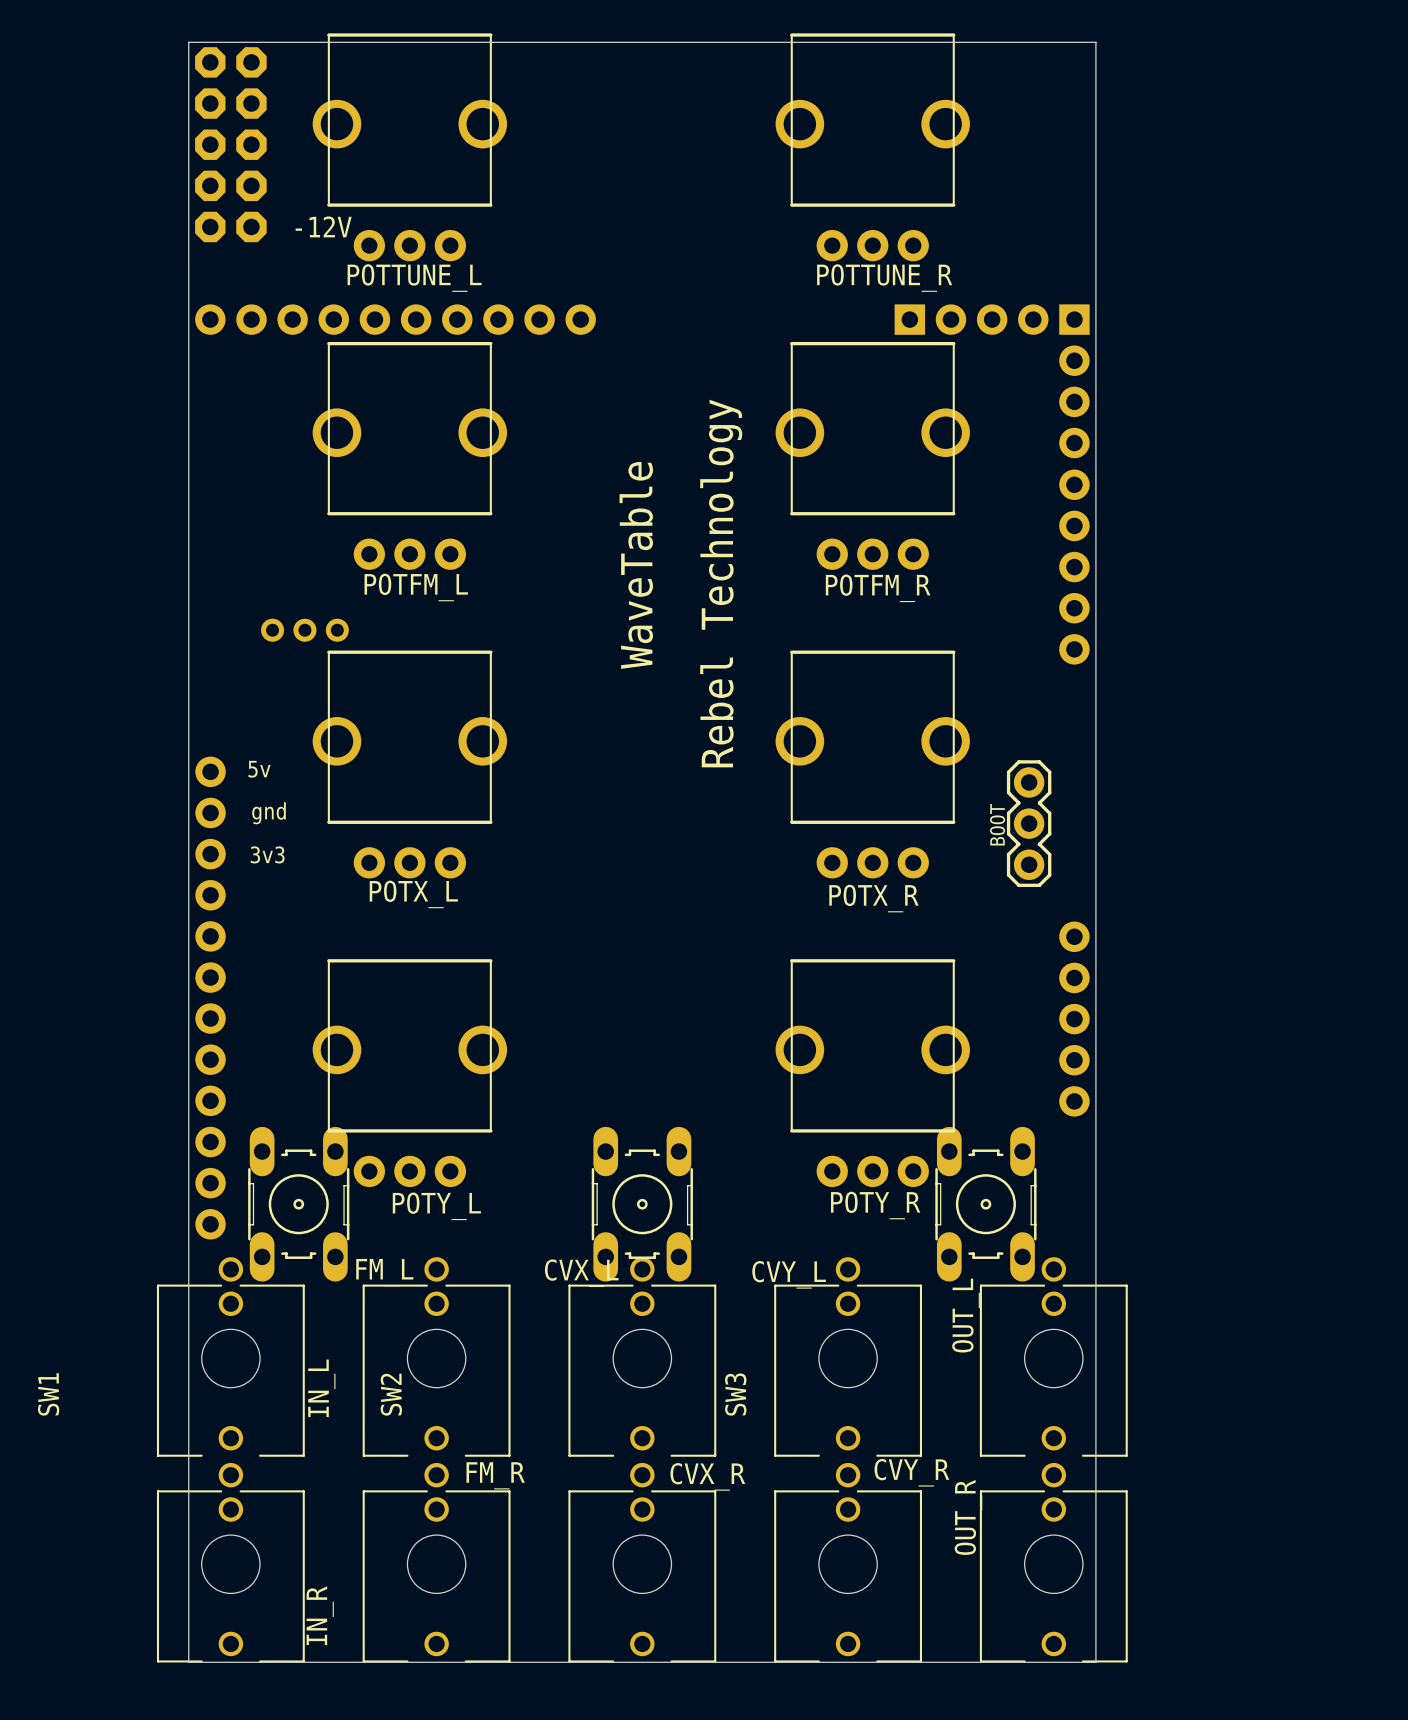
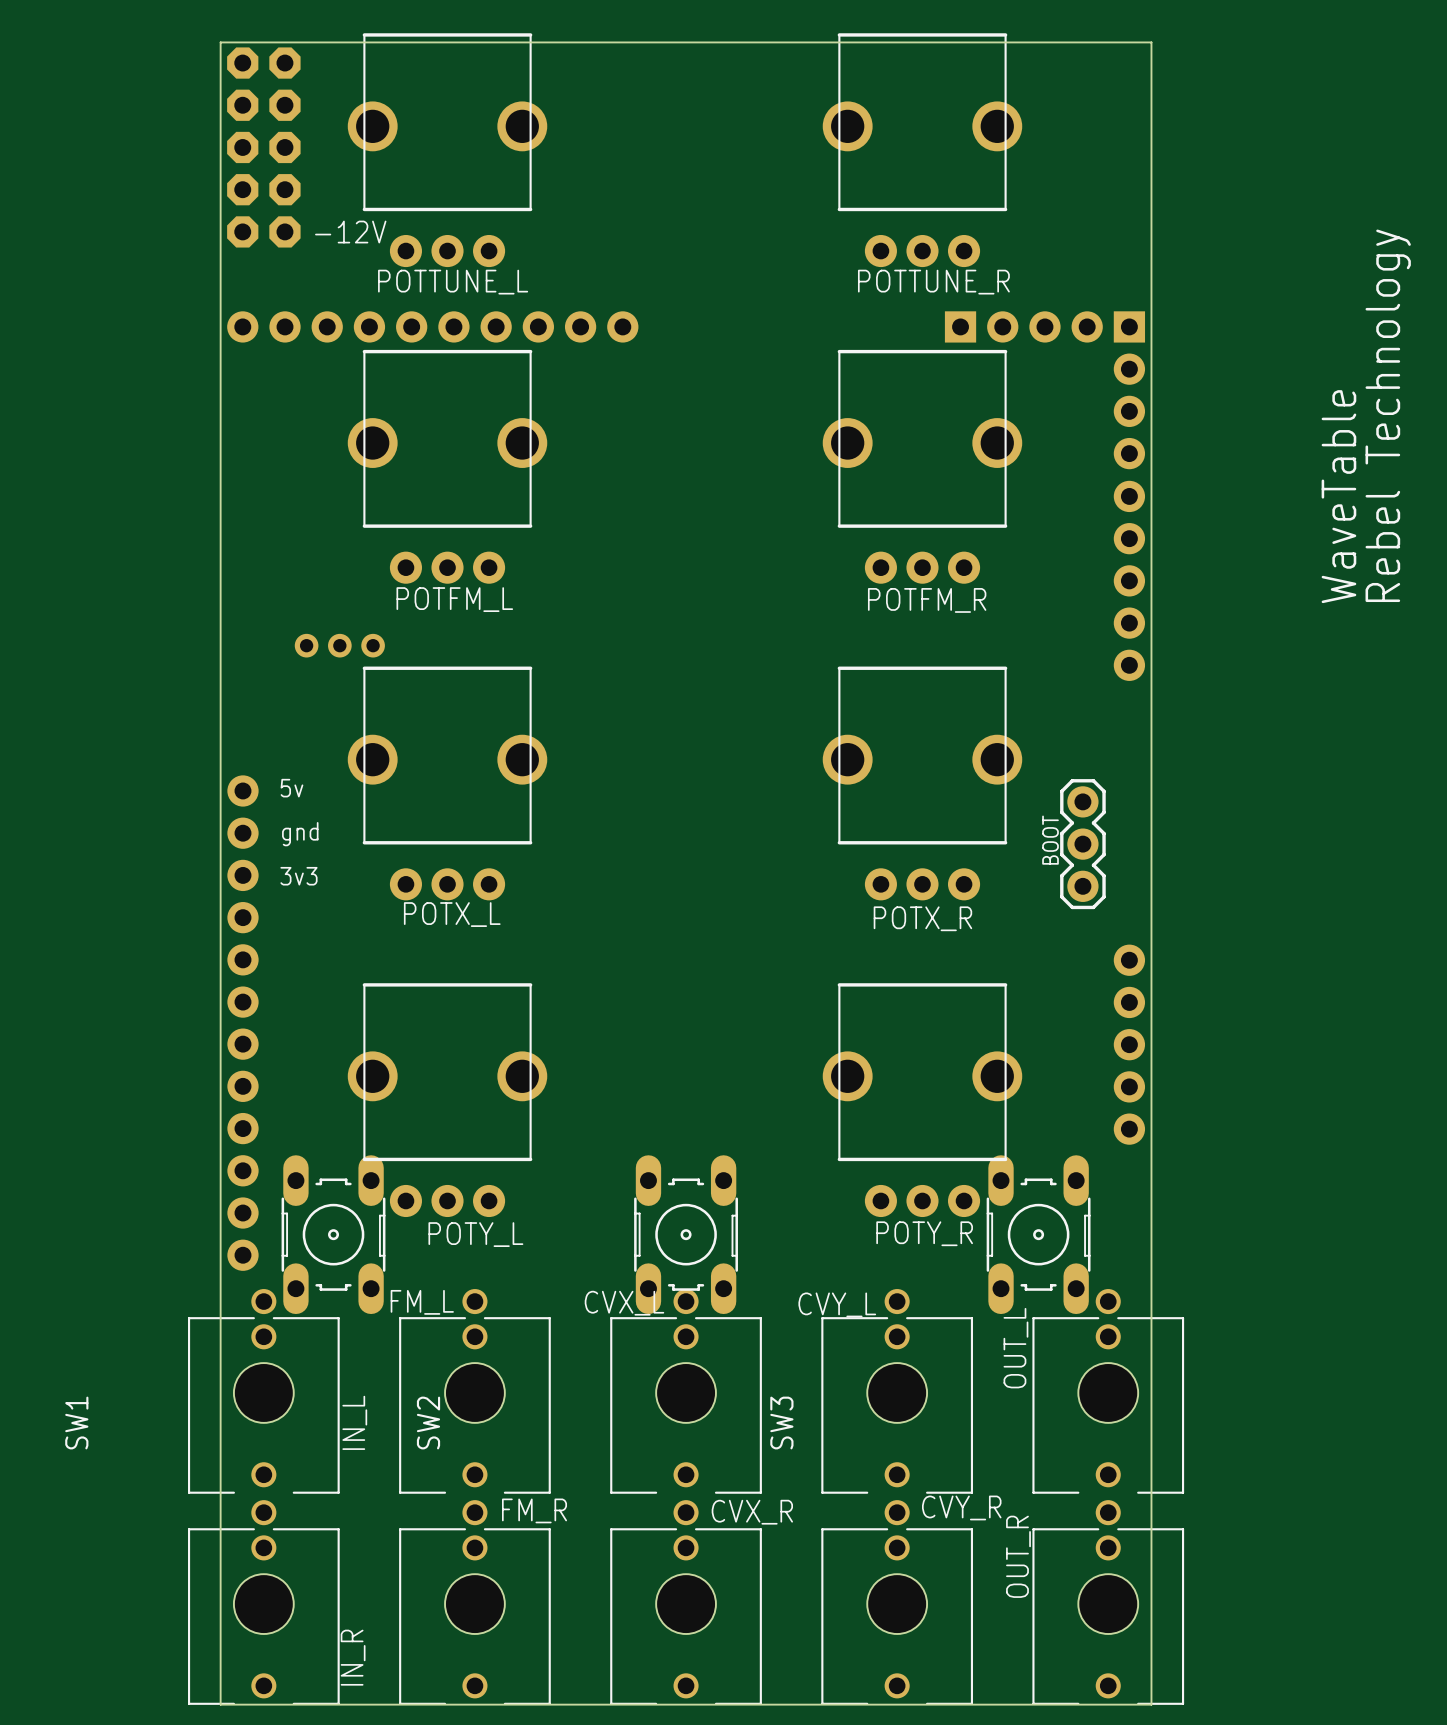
text: none -> Rebel Technology (1388, 415)
text: none -> WaveTable (1338, 496)
text: WaveTable (636, 565) -> none
text: Rebel Technology (721, 583) -> none

